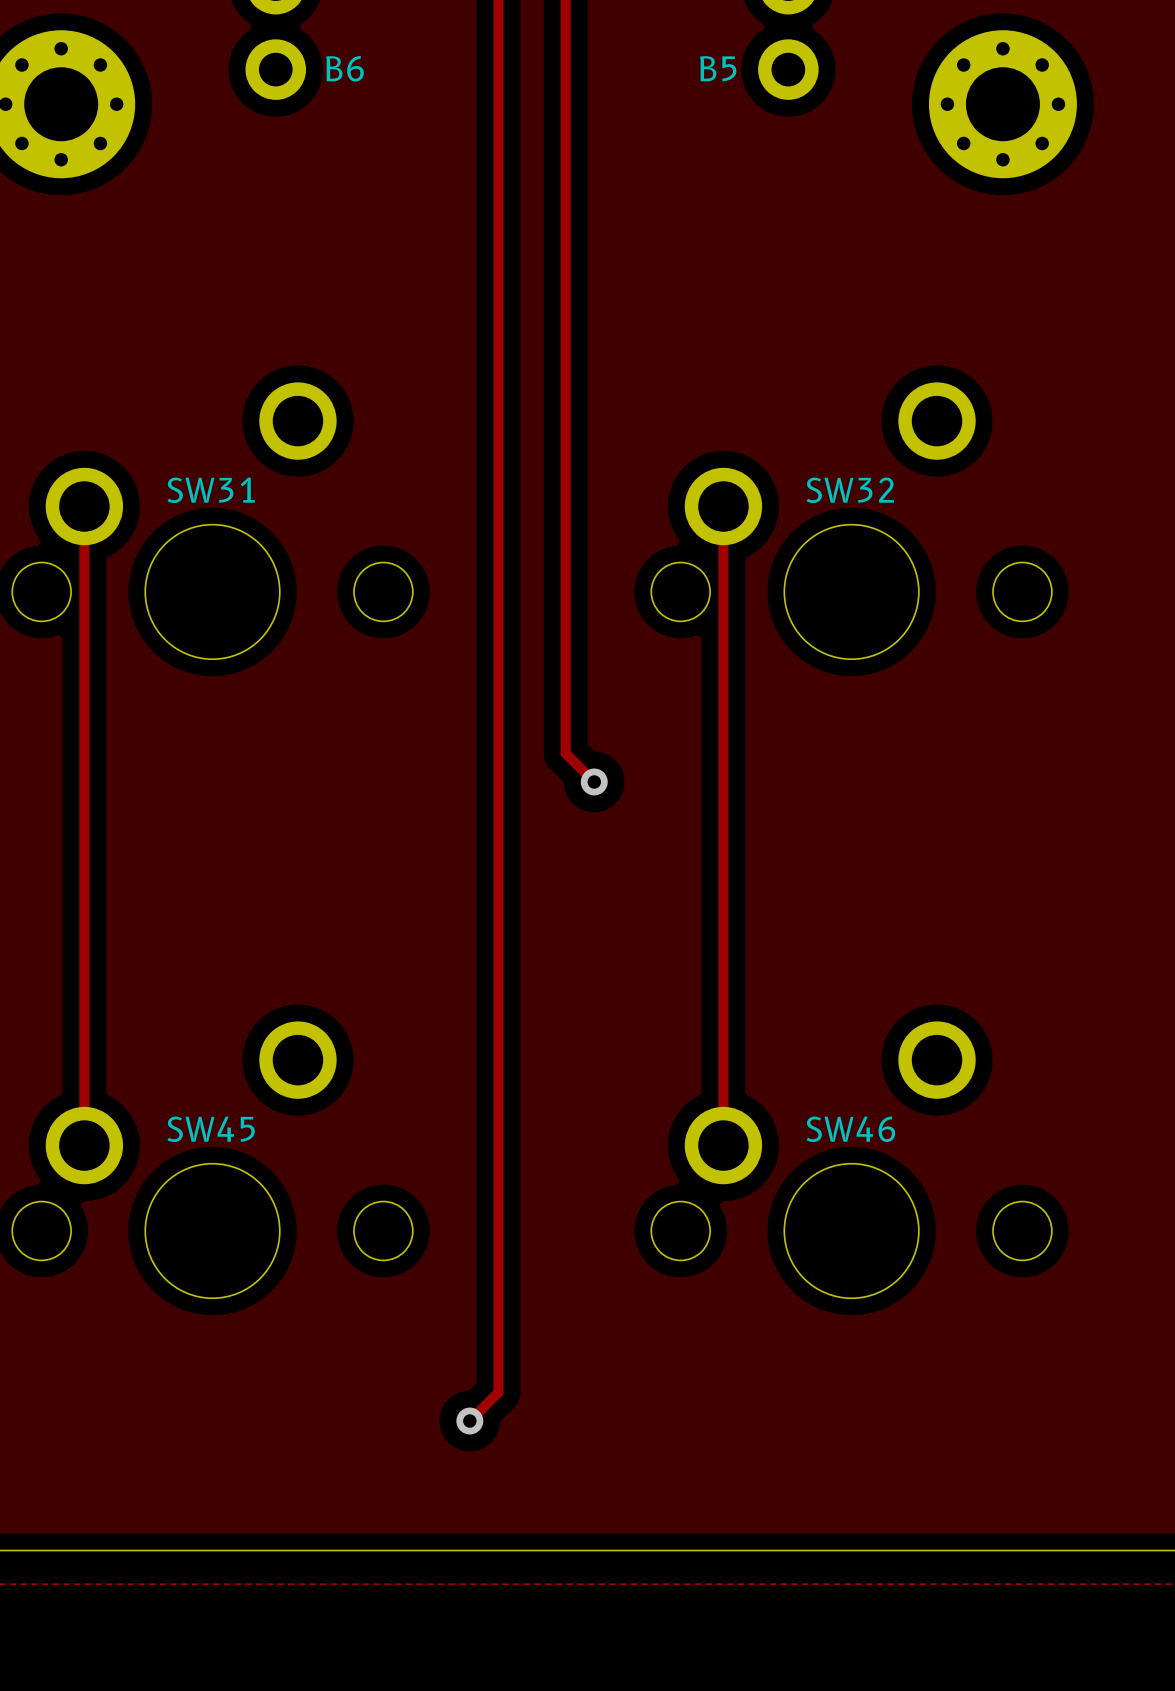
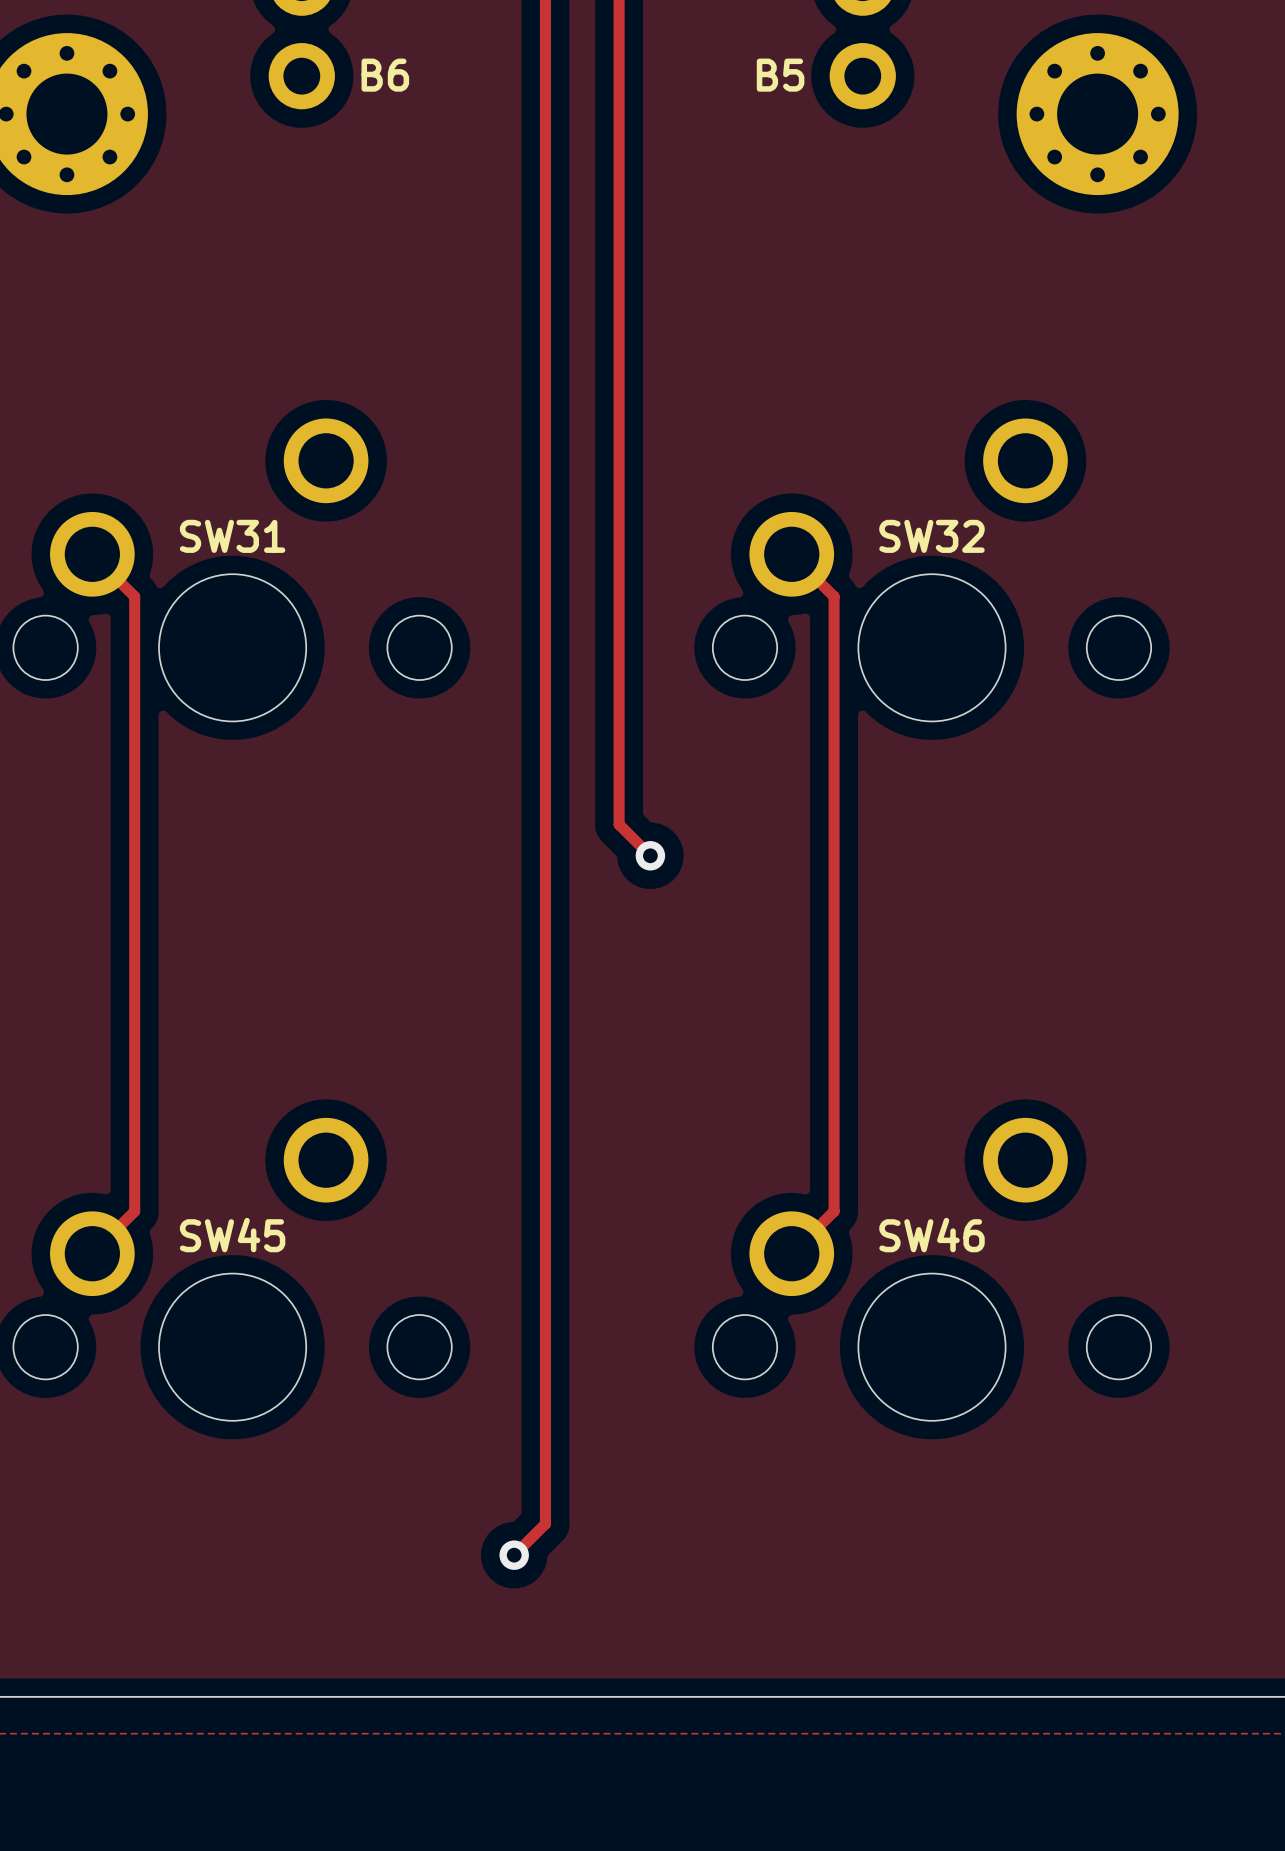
track: (84, 506) (84, 1145) -> (92, 554) (134, 596) (134, 1211) (92, 1253)
track: (723, 506) (723, 1145) -> (791, 554) (834, 596) (834, 1211) (791, 1253)

